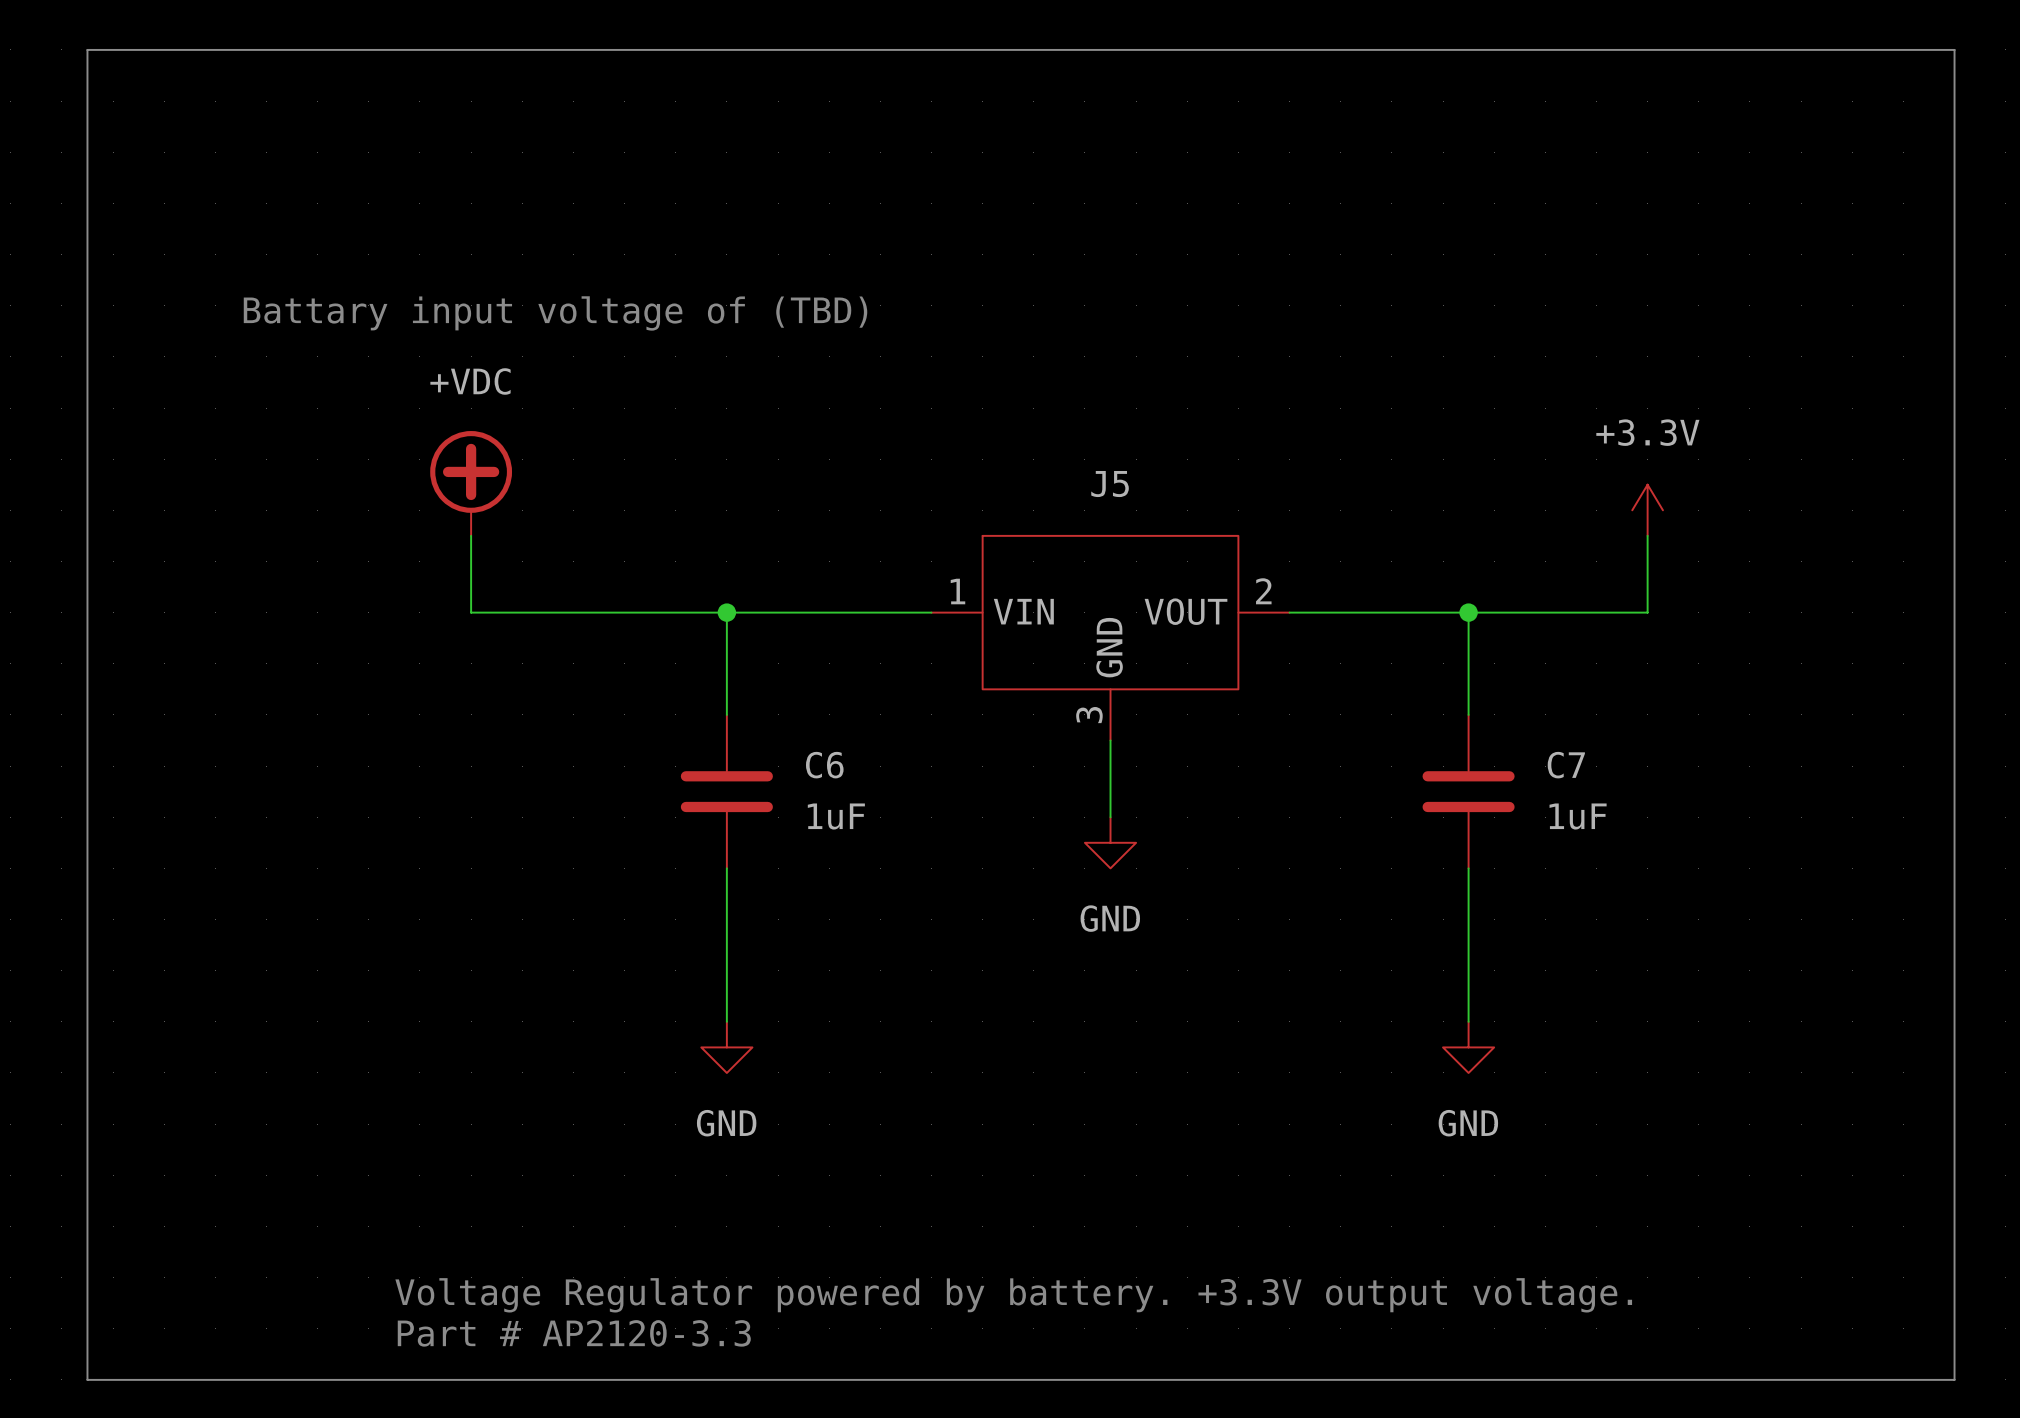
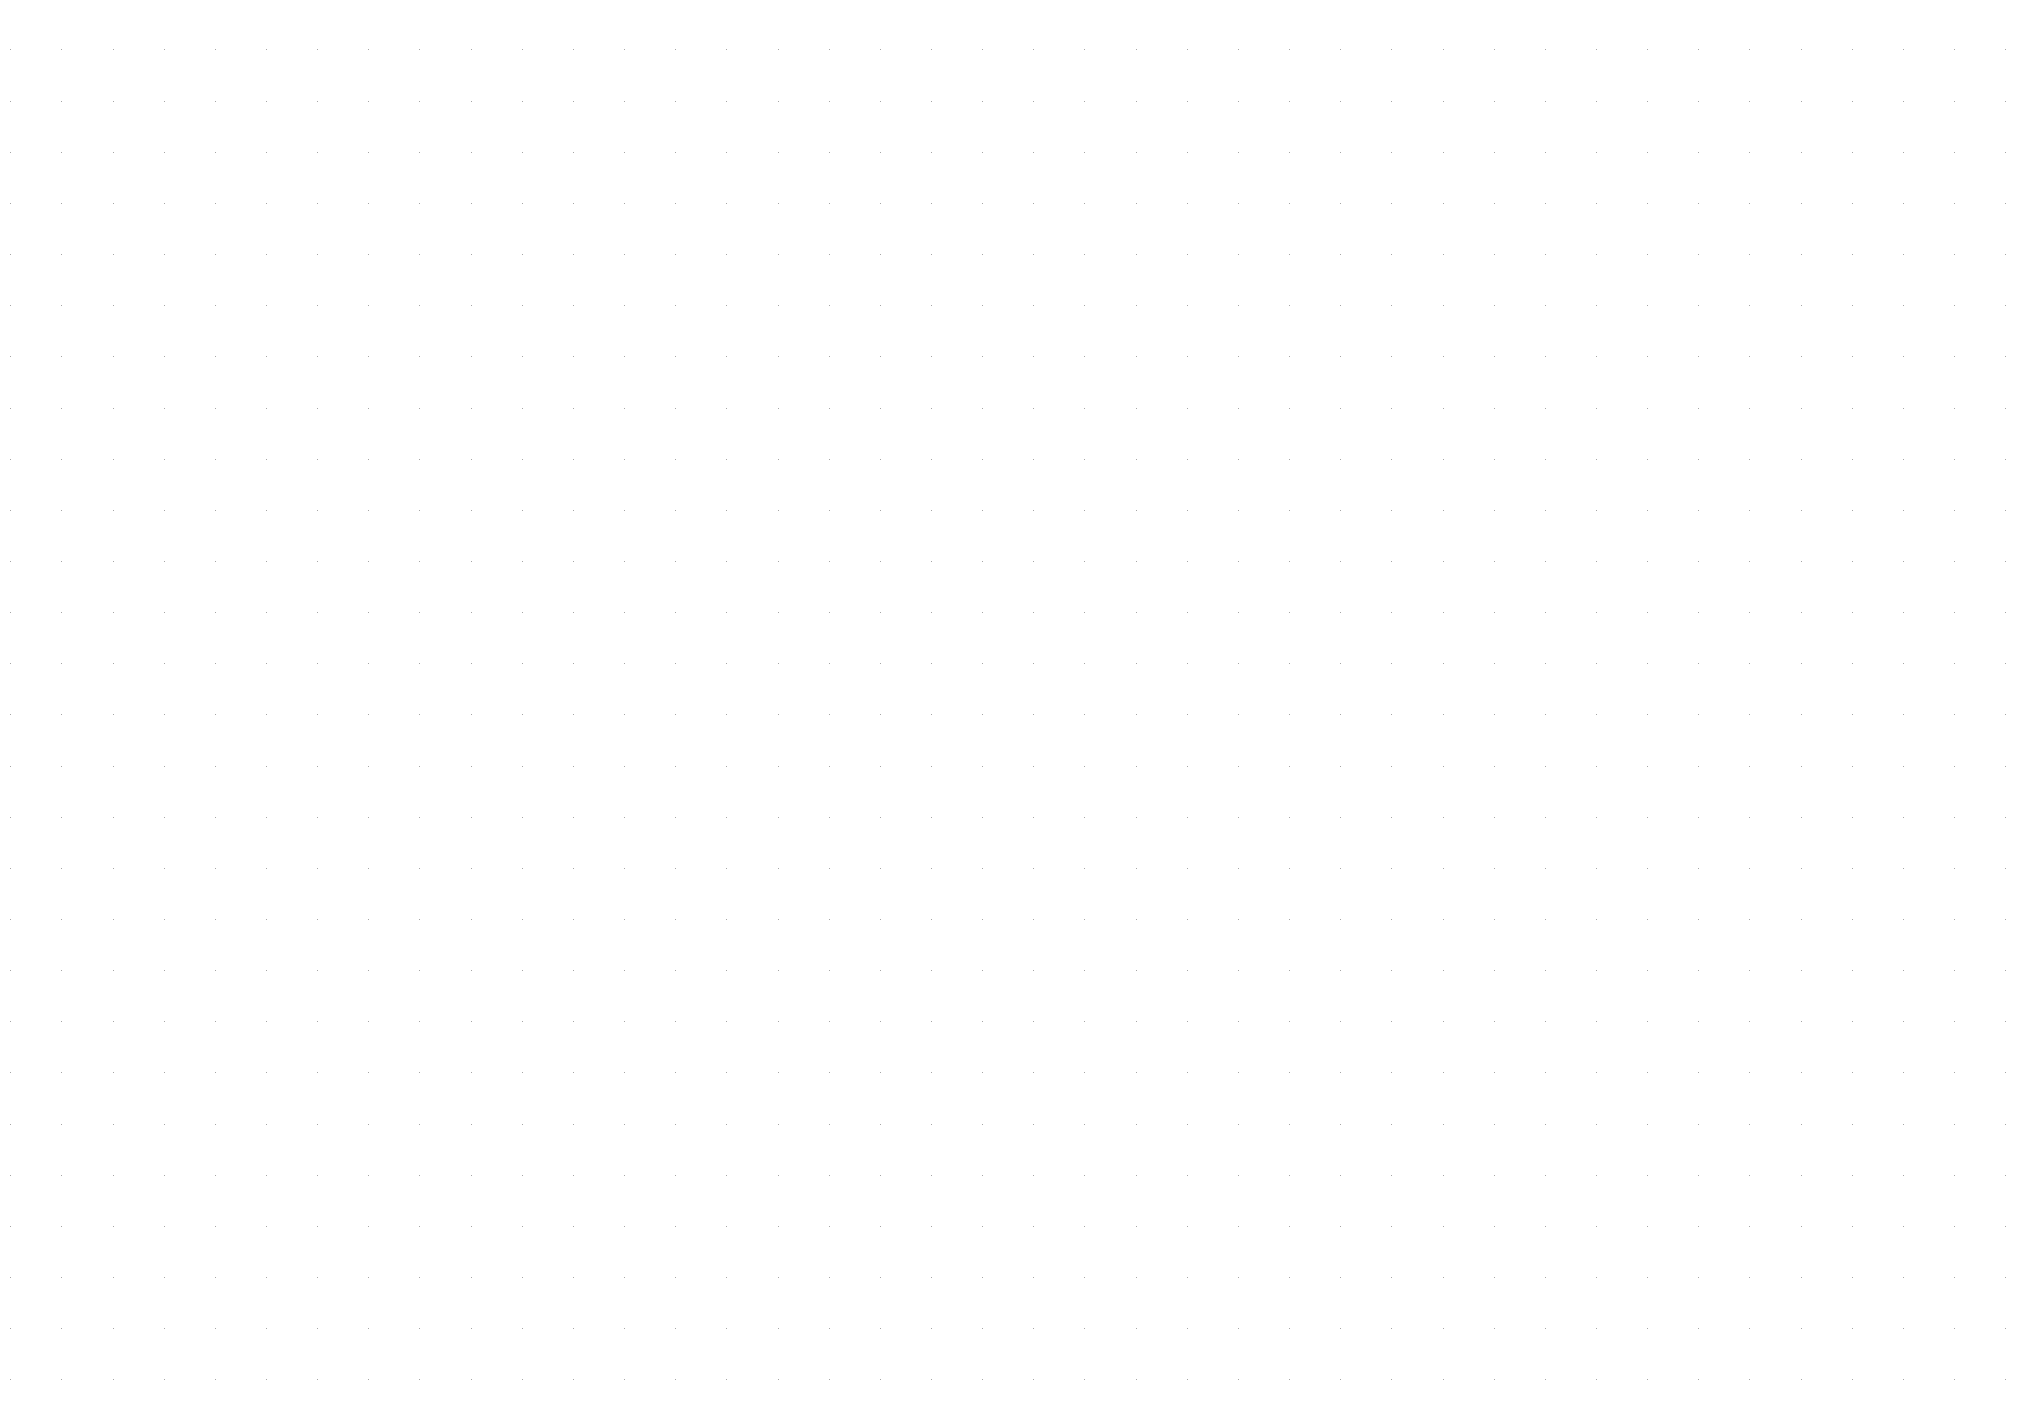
line: (87, 49) (1954, 49) (1954, 1379) (87, 1379) (87, 49) -> none
text: Battary input voltage of (TBD) (555, 313) -> none
power symbol: +VDC (471, 483) -> none
power symbol: +3.3V (1647, 510) -> none
wire: (471, 535) (471, 612) (931, 612) -> none
wire: (1647, 535) (1647, 612) (1289, 612) -> none
wire: (726, 612) (726, 714) -> none
junction: (726, 612) -> none
wire: (1468, 612) (1468, 714) -> none
junction: (1468, 612) -> none
J5: (1110, 638) -> none
wire: (1110, 740) (1110, 817) -> none
C6: 1uF (726, 791) -> none
C7: 1uF (1468, 791) -> none
power symbol: GND (1110, 842) -> none
wire: (726, 868) (726, 1021) -> none
wire: (1468, 868) (1468, 1021) -> none
power symbol: GND (726, 1047) -> none
power symbol: GND (1468, 1047) -> none
text: Voltage Regulator powered by battery. +3.3V output voltage. (1013, 1295) -> none
text: Part # AP2120-3.3 (574, 1333) -> none

